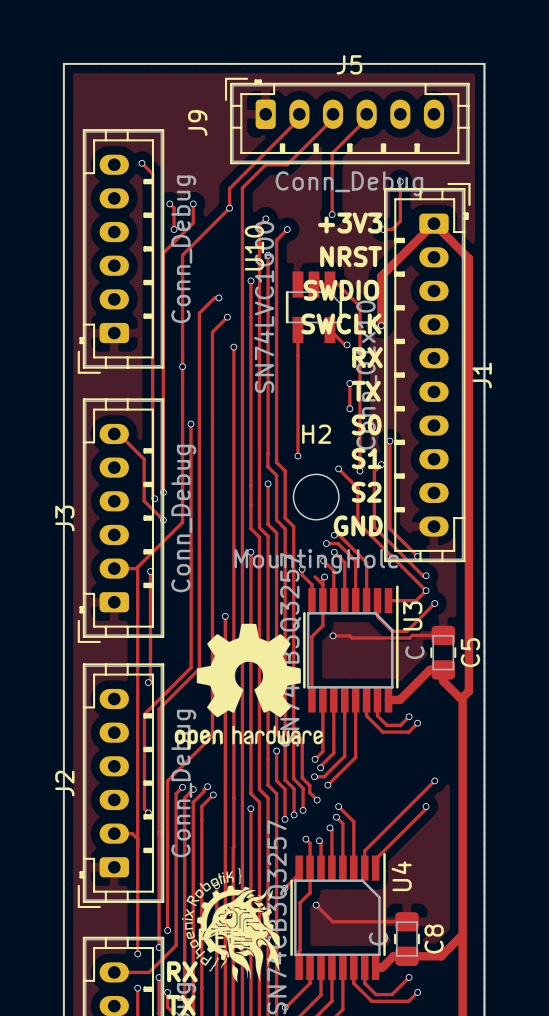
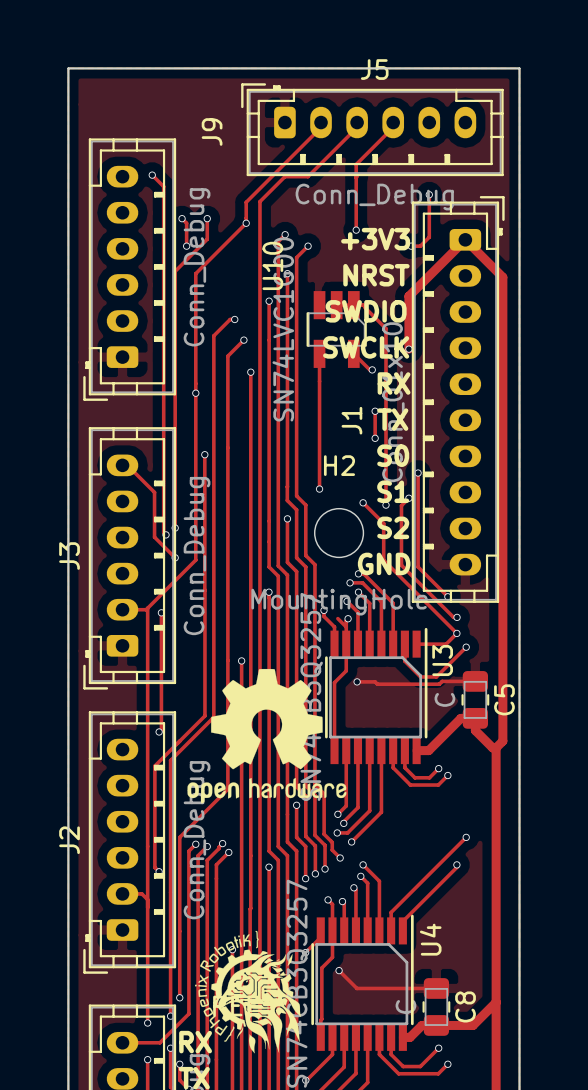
J1 name position: J1 (482, 375) -> J1 (351, 420)

